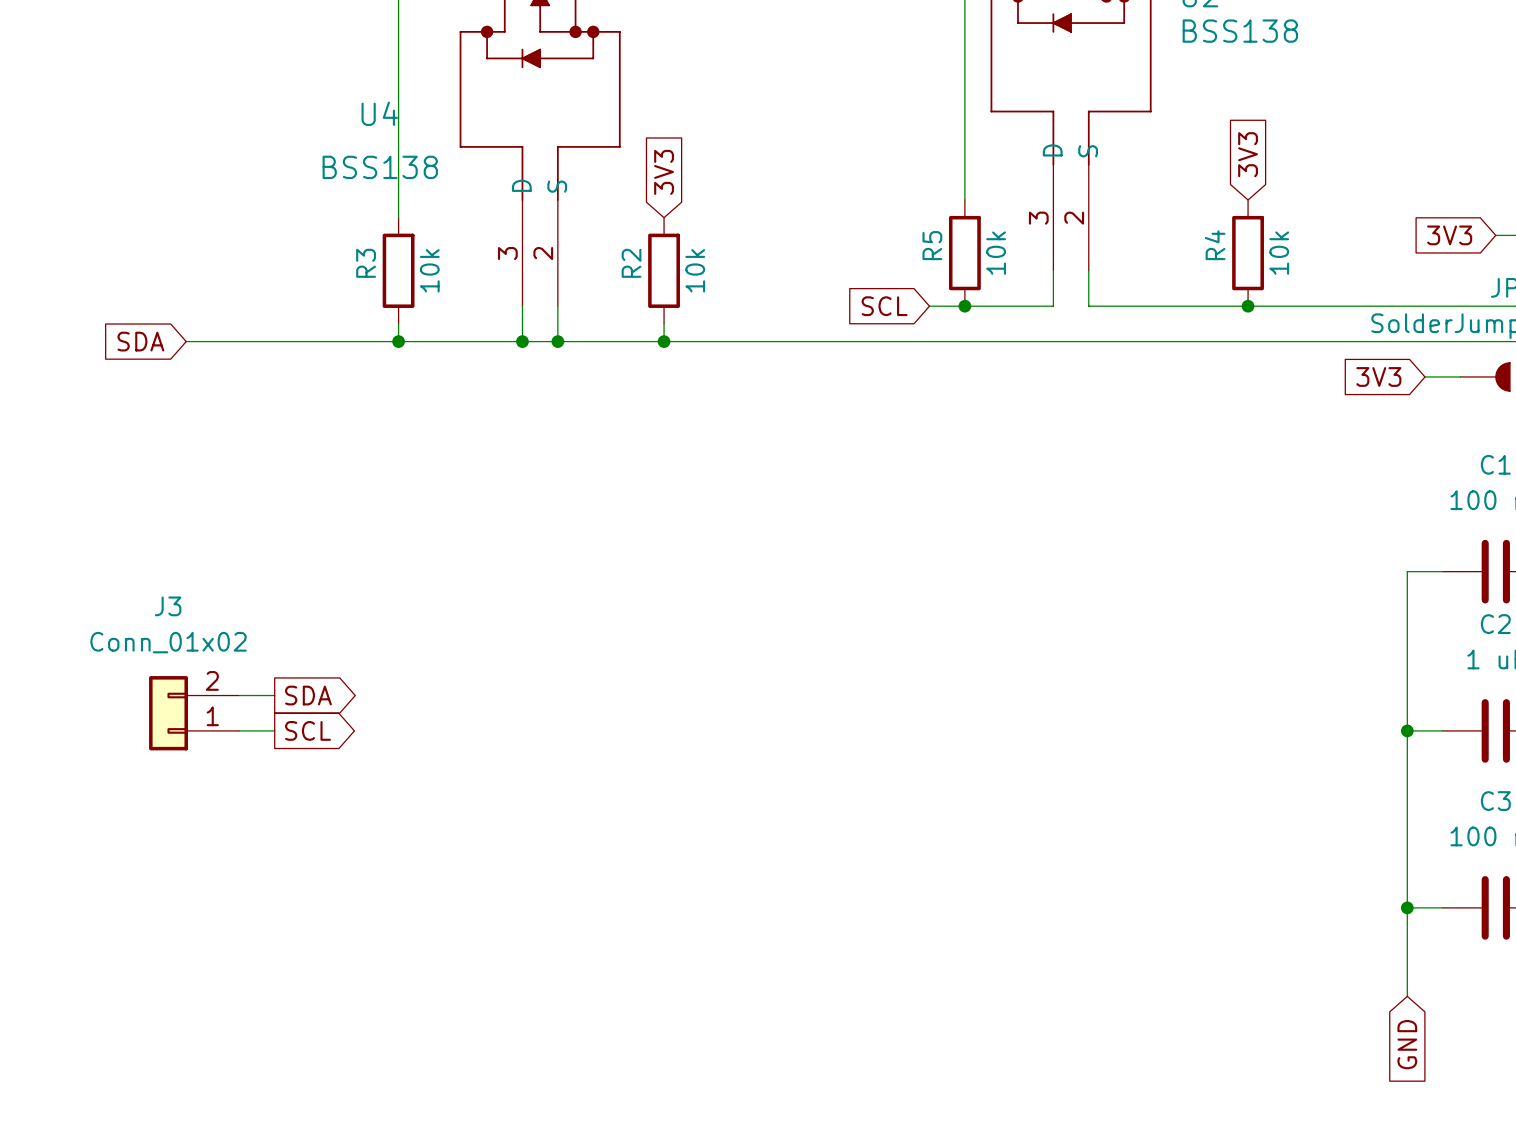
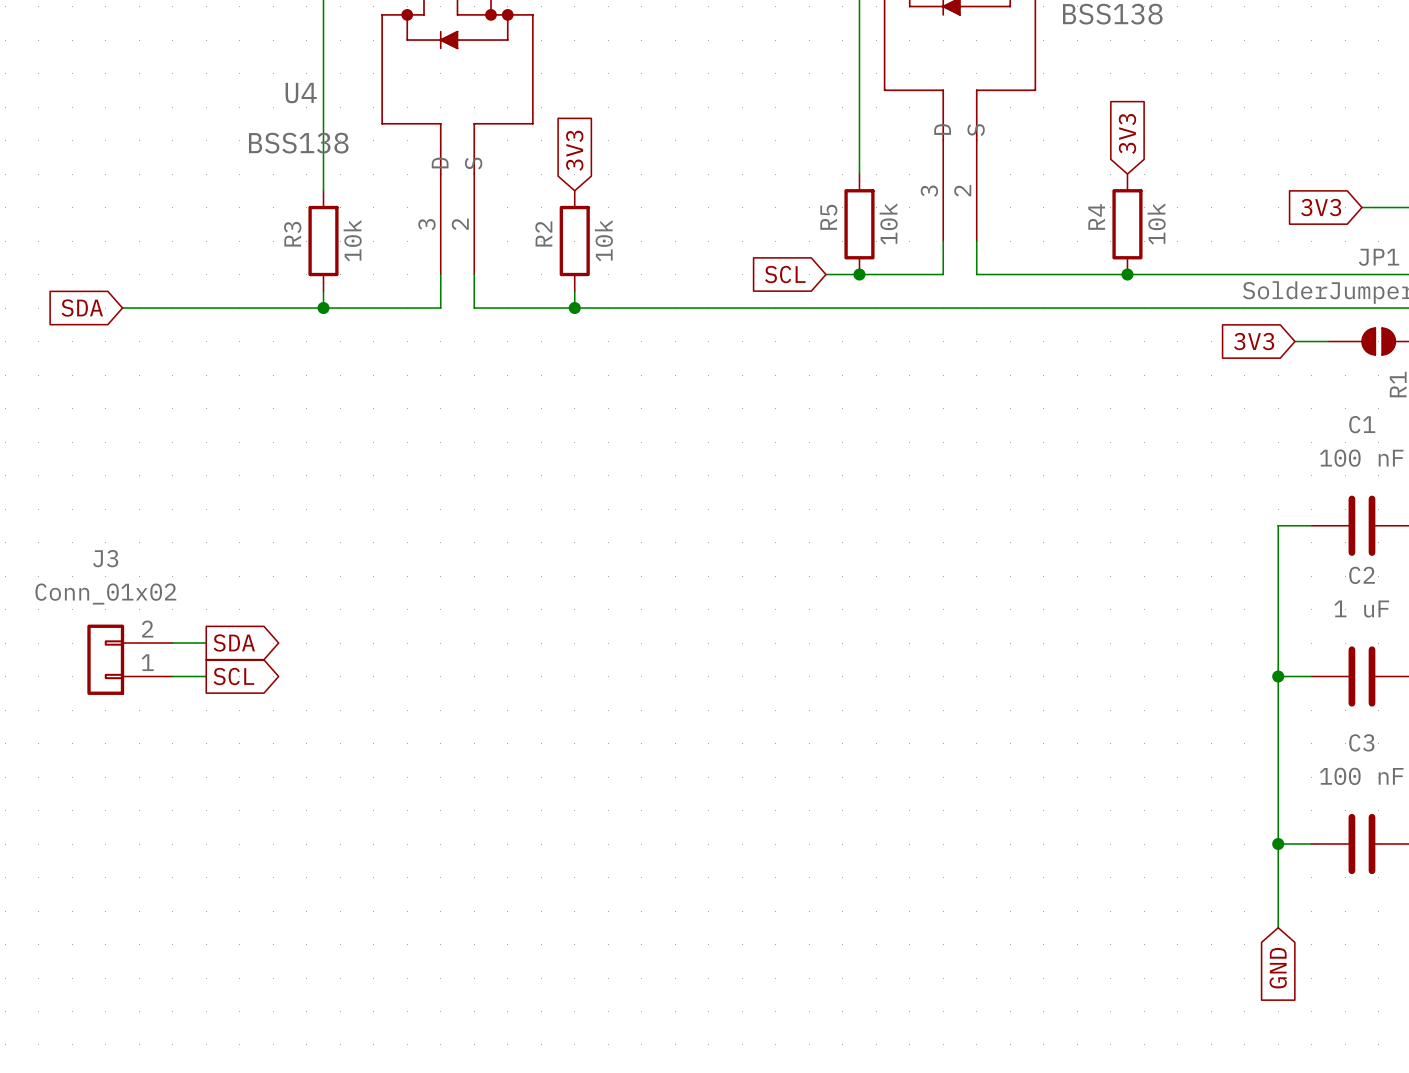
wire: (522, 341) (557, 341) -> none
junction: (522, 341) -> none
junction: (557, 341) -> none

